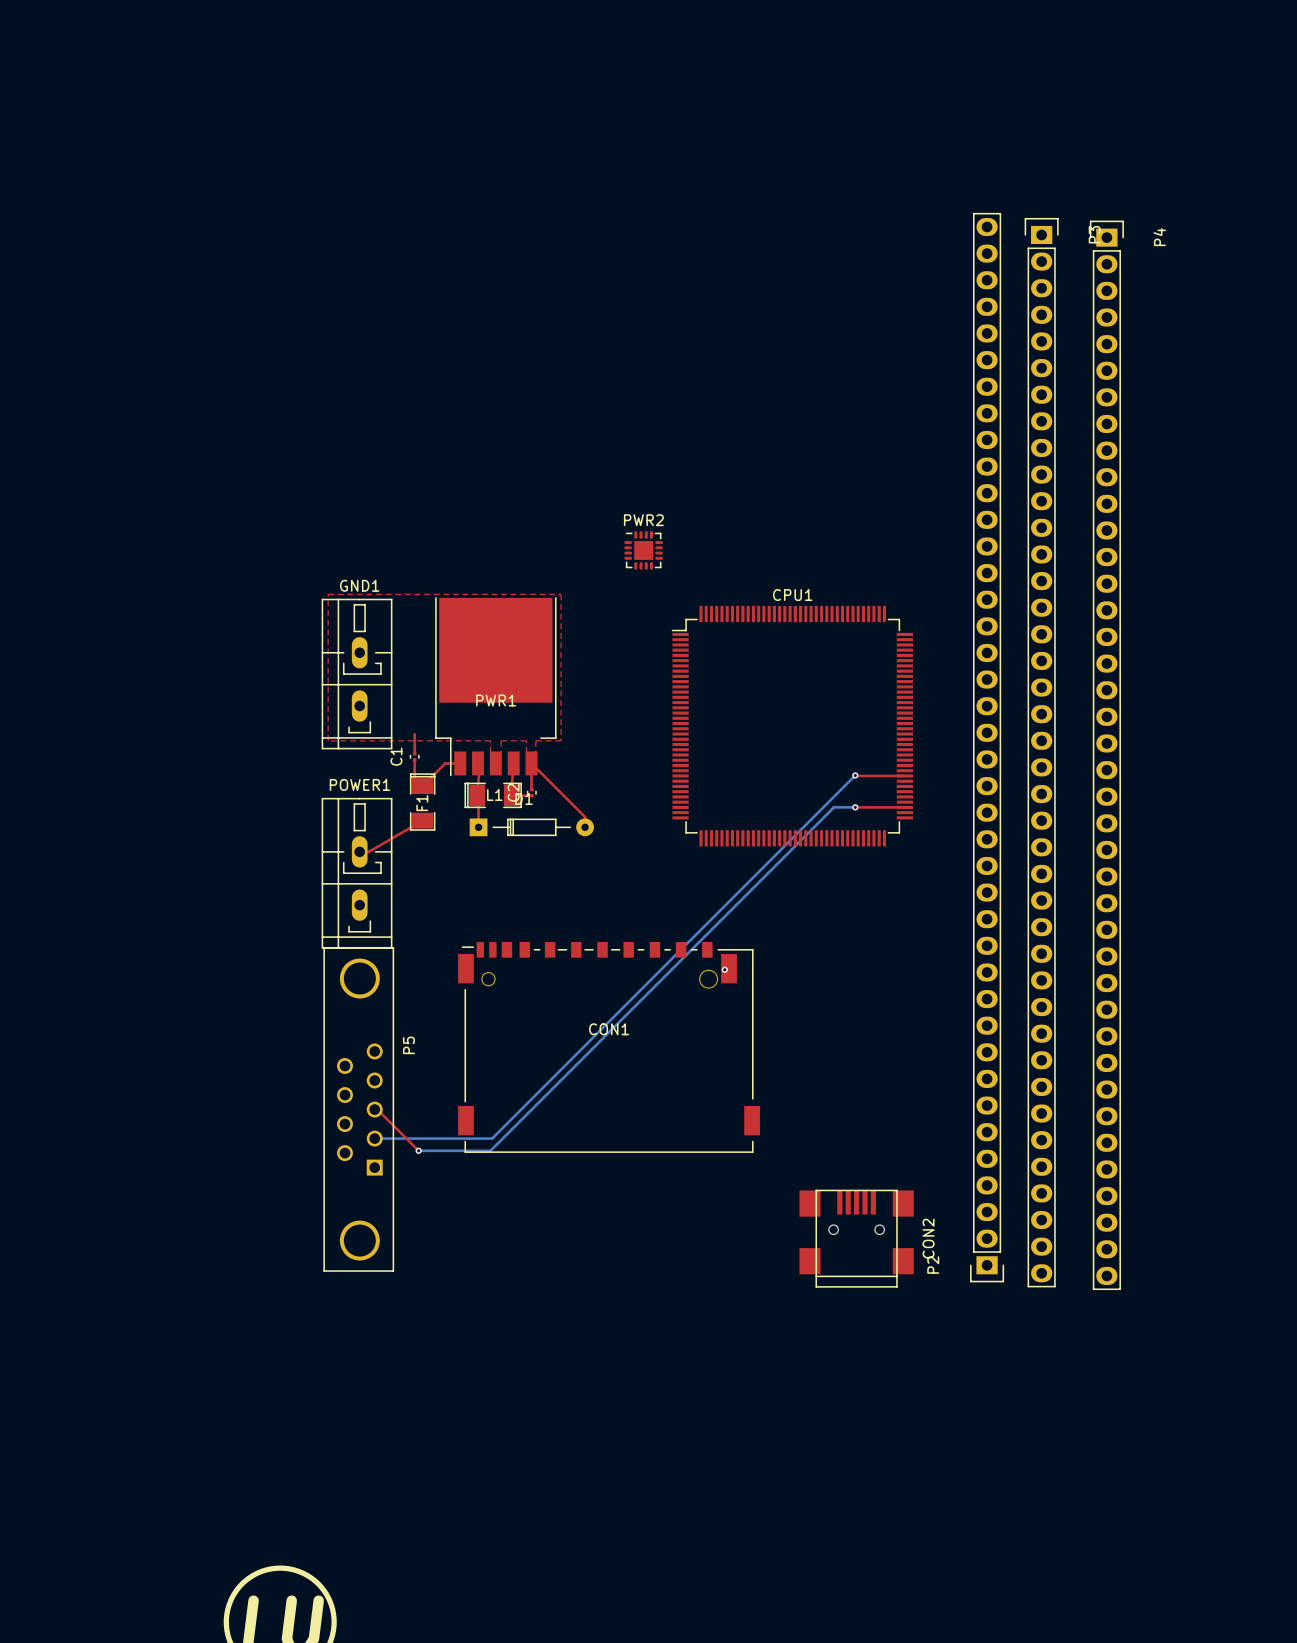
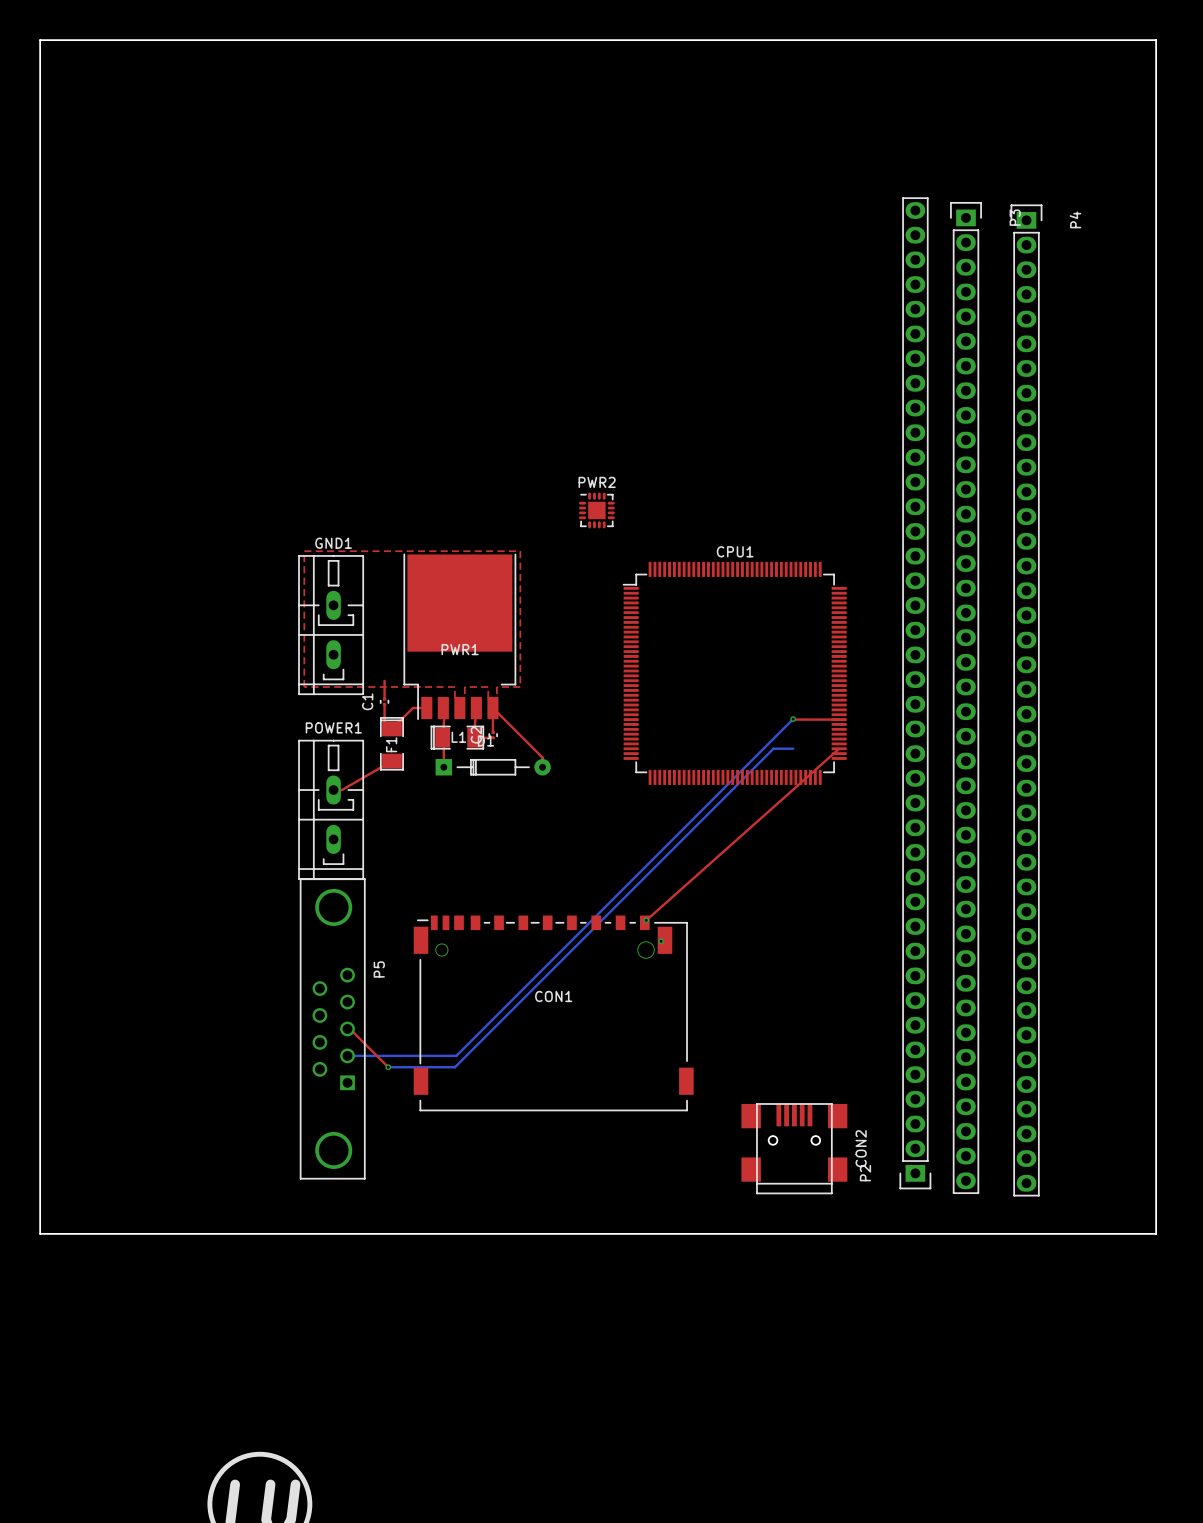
board edge: none -> (40, 40) (40, 1233) (1156, 1233) (1156, 40) (40, 40)
top track: (855, 807) (904, 807) -> (646, 920) (839, 748)
via: (855, 807) -> none
via: (724, 969) -> none
via: none -> (646, 920)
via: none -> (661, 941)
CON1 position: (609, 1047) -> (553, 1013)

